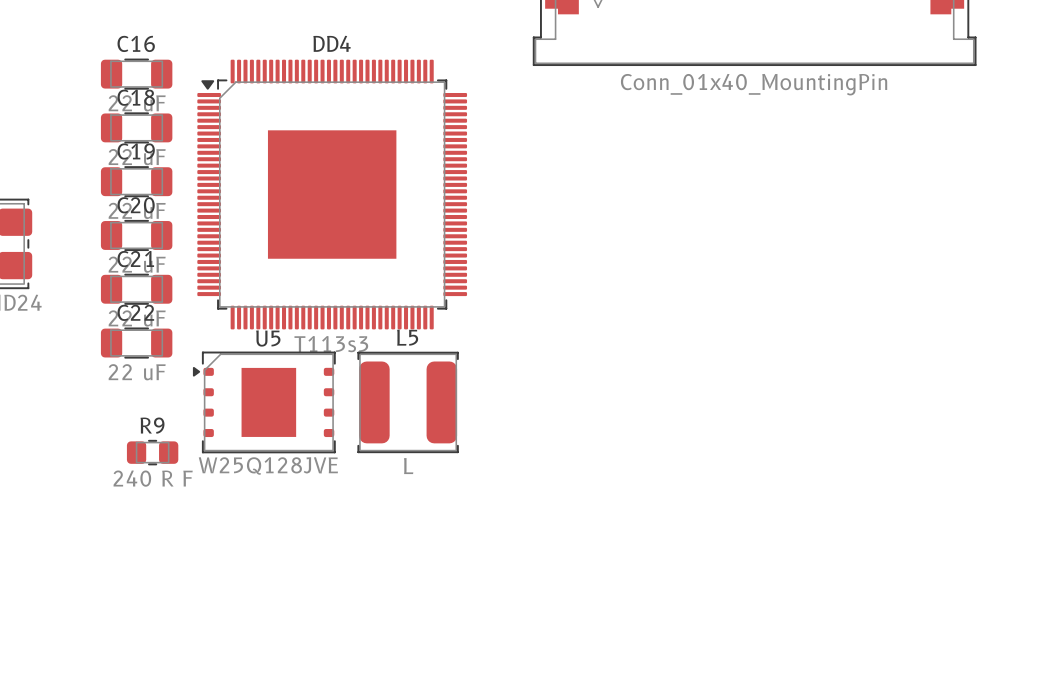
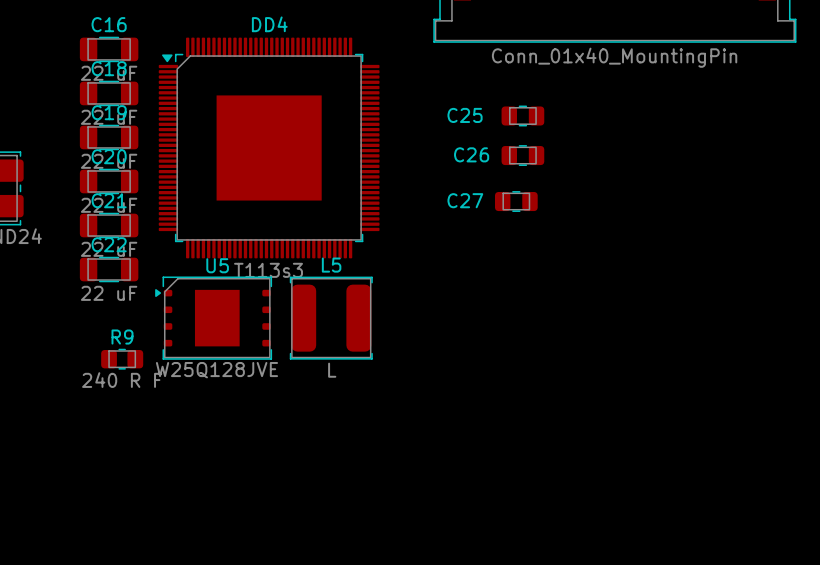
C25: none -> (522, 115)
C26: none -> (522, 155)
C27: none -> (516, 201)

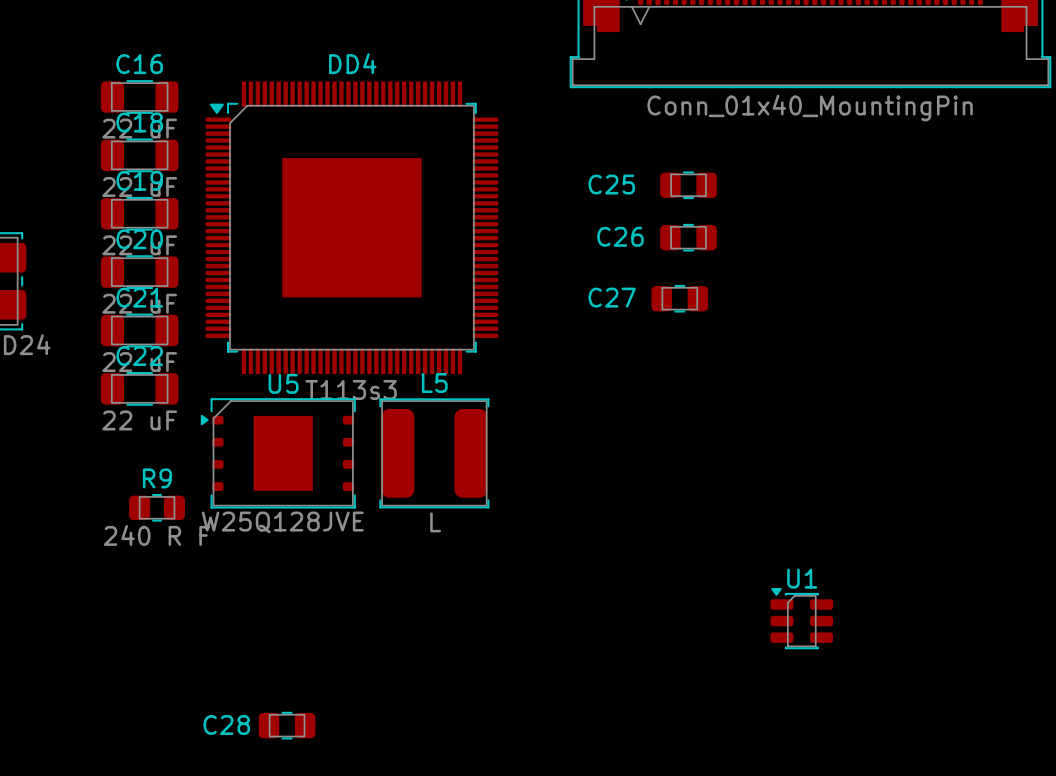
U1: none -> (801, 618)
C28: none -> (287, 725)

